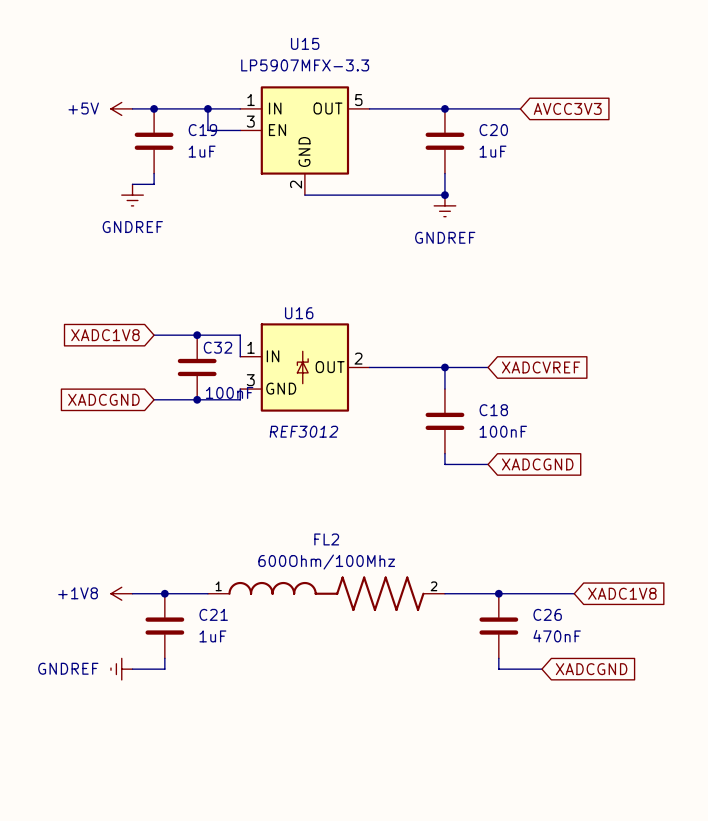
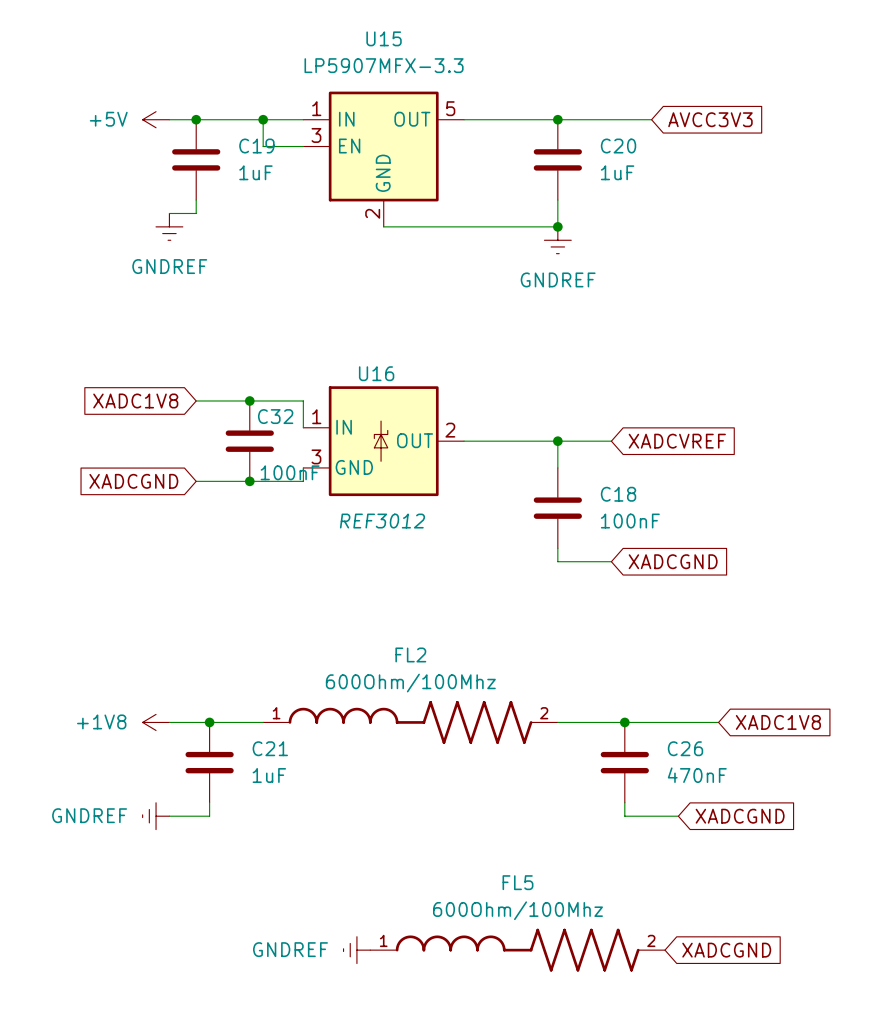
power symbol: none -> GNDREF (356, 950)
FL5: none -> 600Ohm/100Mhz (517, 950)
global label: none -> XADCGND (726, 950)

